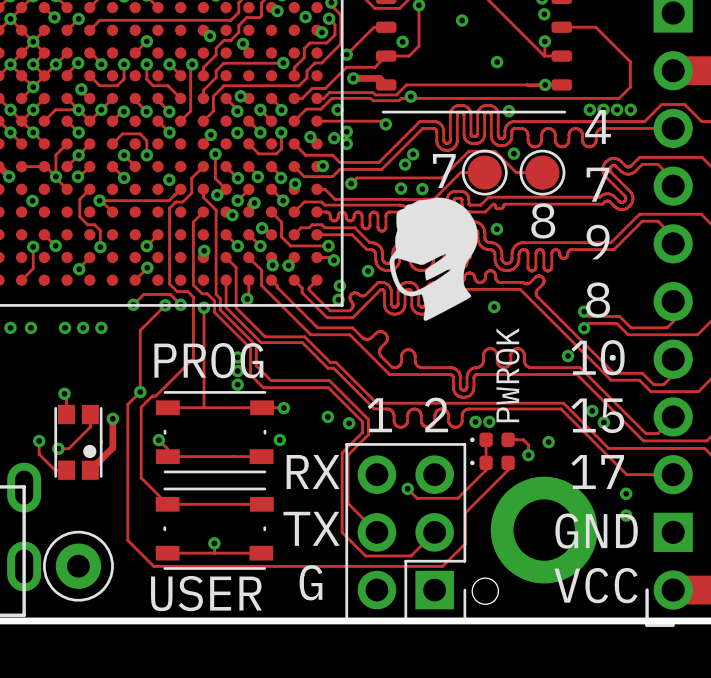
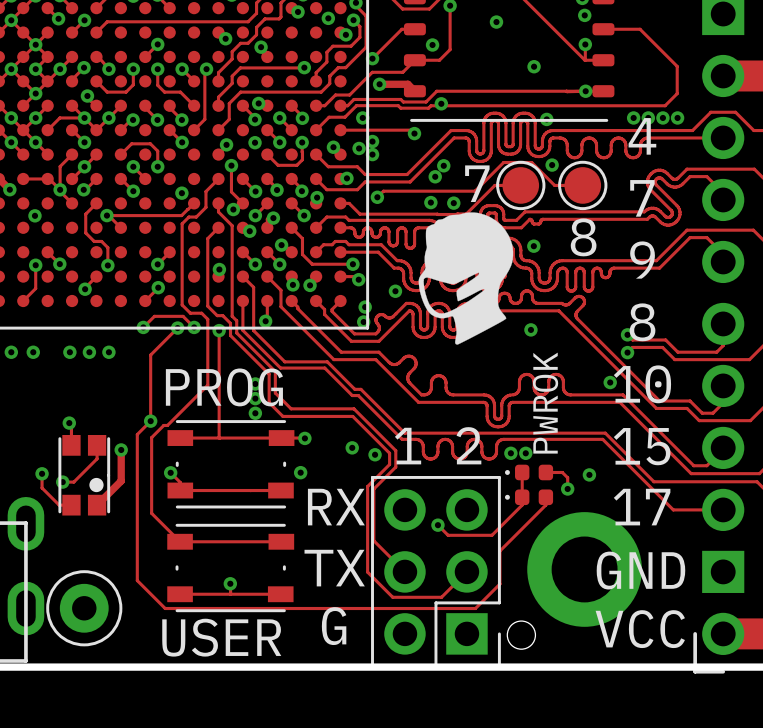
via: (592, 410) -> none
via: (603, 422) -> none
via: (626, 493) -> none
via: (626, 515) -> none

